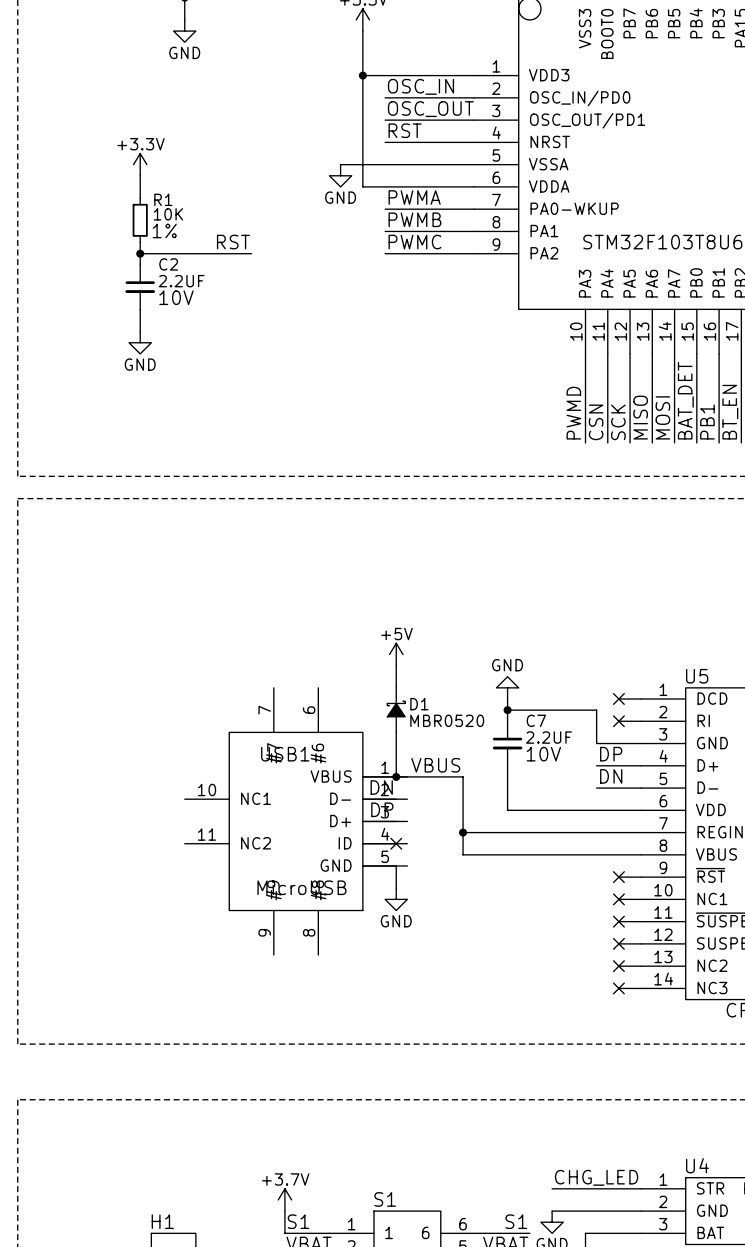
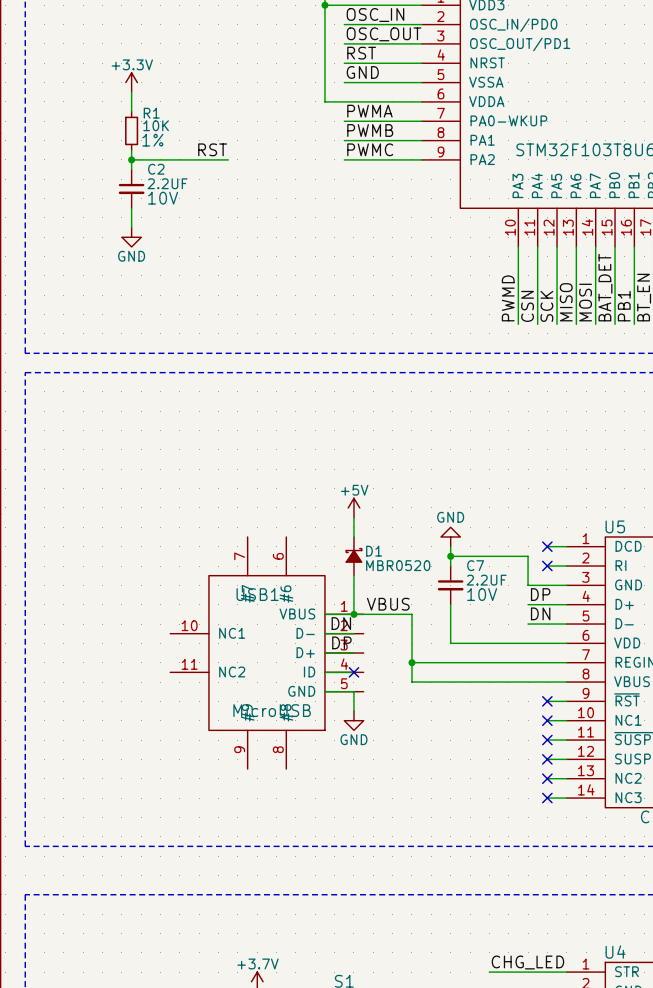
label: none -> GND (362, 72)
wire: (340, 164) (385, 164) -> none
power symbol: GND (340, 175) -> none

